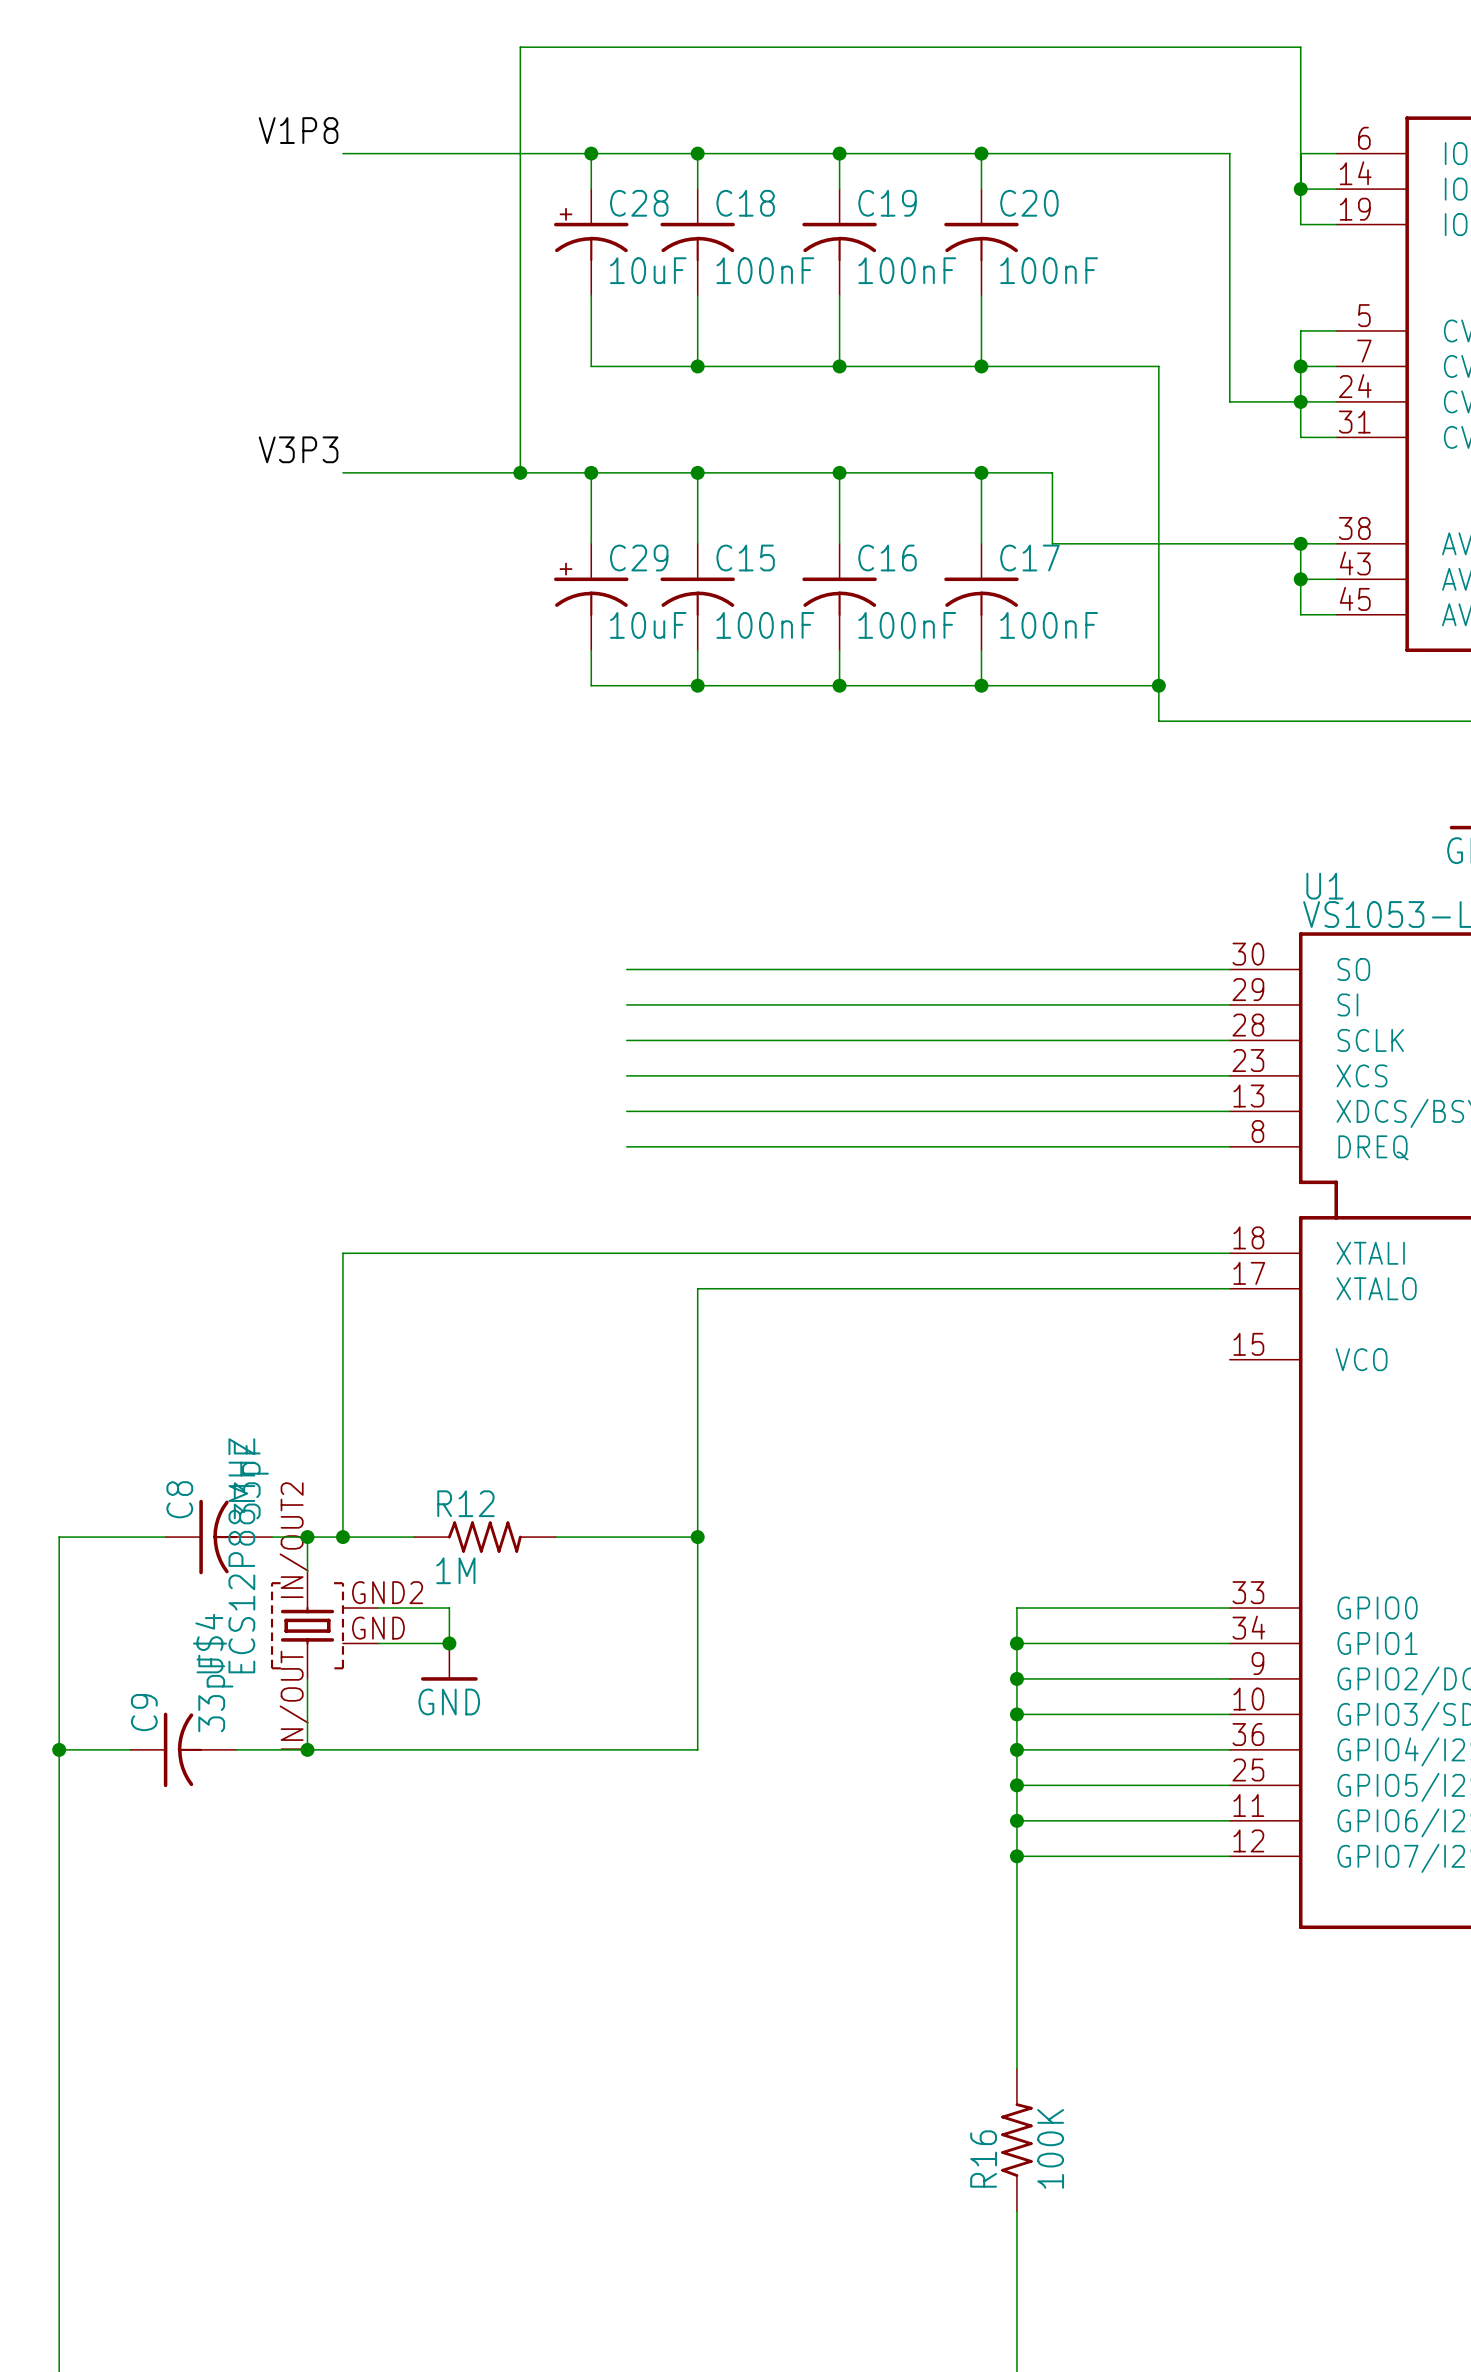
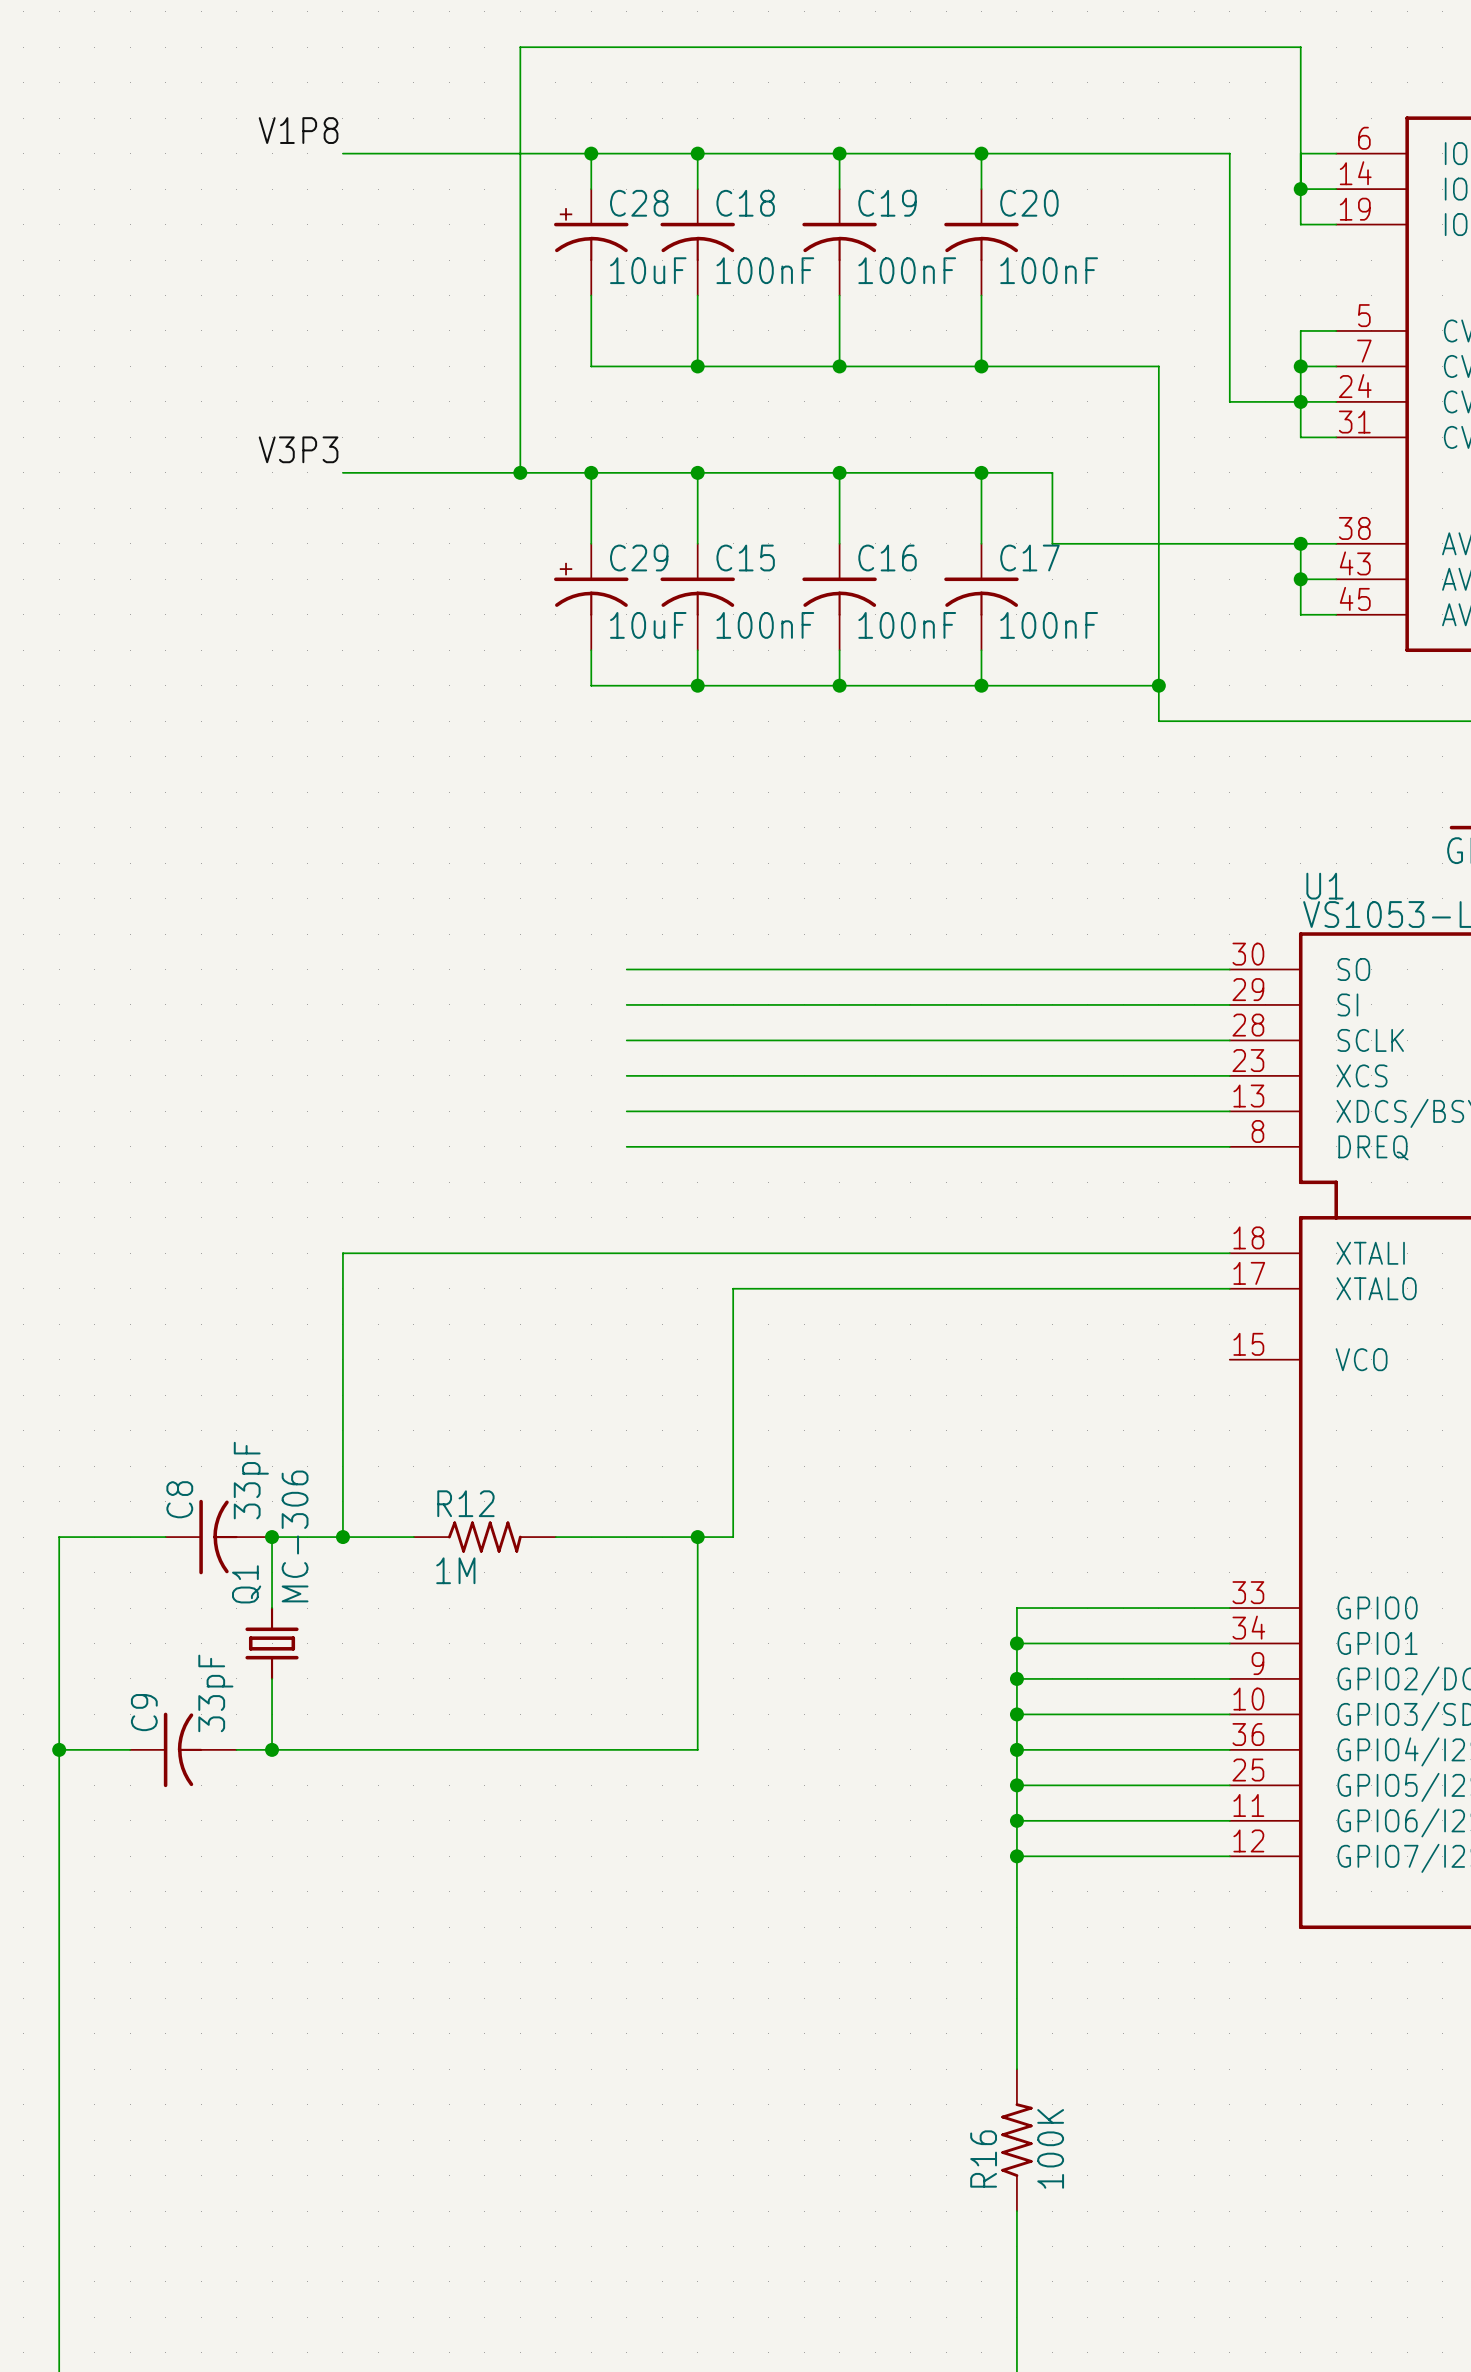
wire: (733, 1288) (697, 1288) (697, 1537) -> (733, 1288) (733, 1537) (697, 1537)
wire: none -> (272, 1537) (272, 1608)
wire: (307, 1537) (307, 1572) -> none
junction position: (307, 1537) -> (272, 1537)
wire: (378, 1608) (449, 1608) (449, 1643) (378, 1643) -> none
U$4: ECS12P88MHZ (324, 1625) -> none
Q1: none -> MC-306 (272, 1643)
junction: (449, 1643) -> none
power symbol: GND (449, 1662) -> none
wire: (307, 1678) (307, 1749) -> (272, 1678) (272, 1749)
junction position: (307, 1749) -> (272, 1749)

